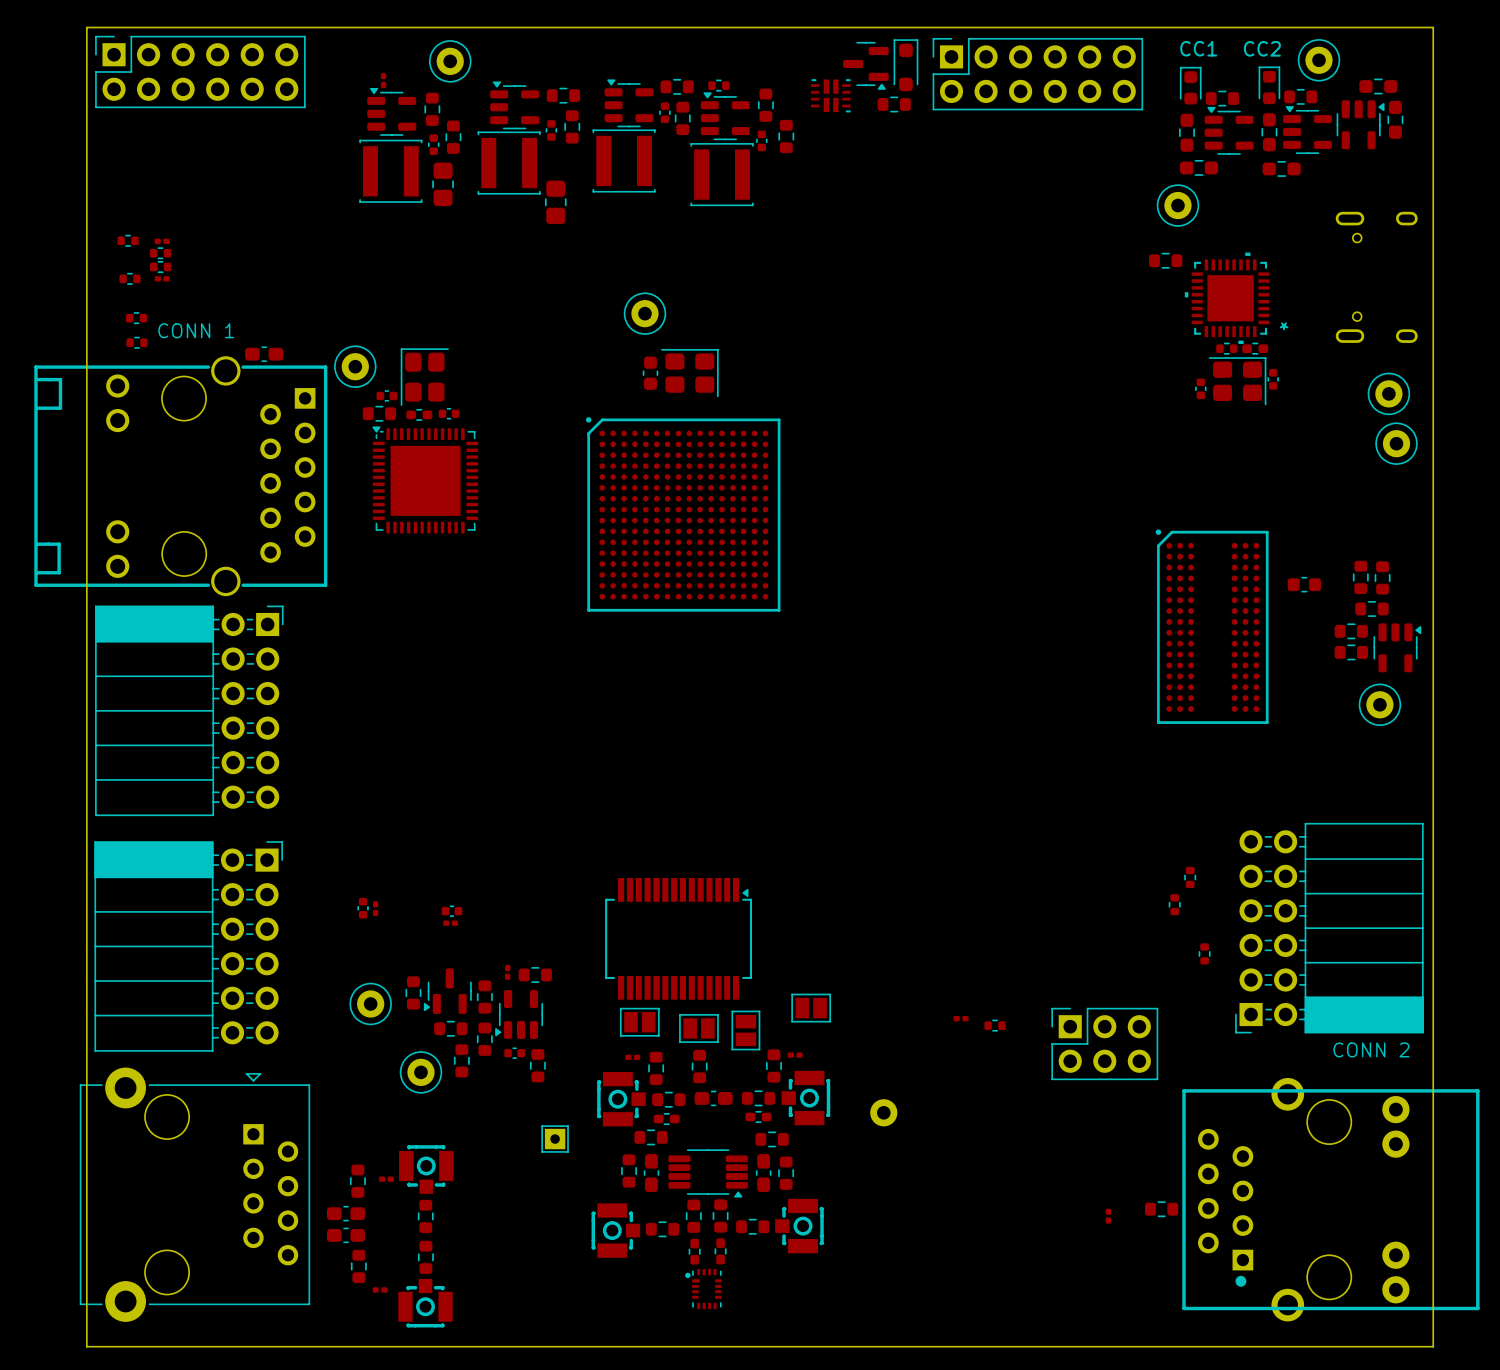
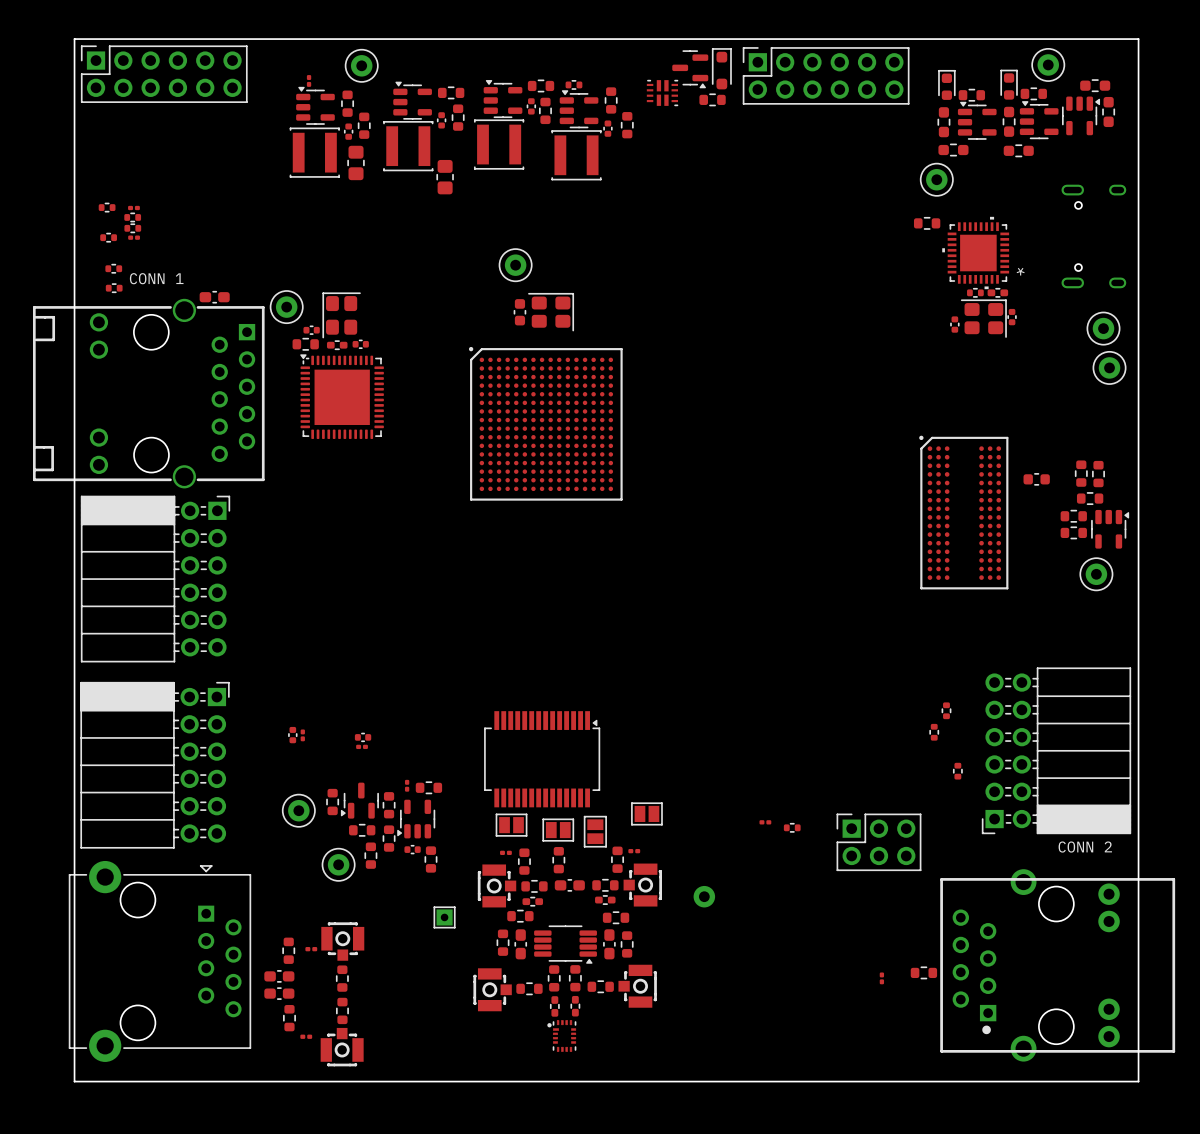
text: CC1 (1198, 48) -> none
text: CC2 (1262, 48) -> none

